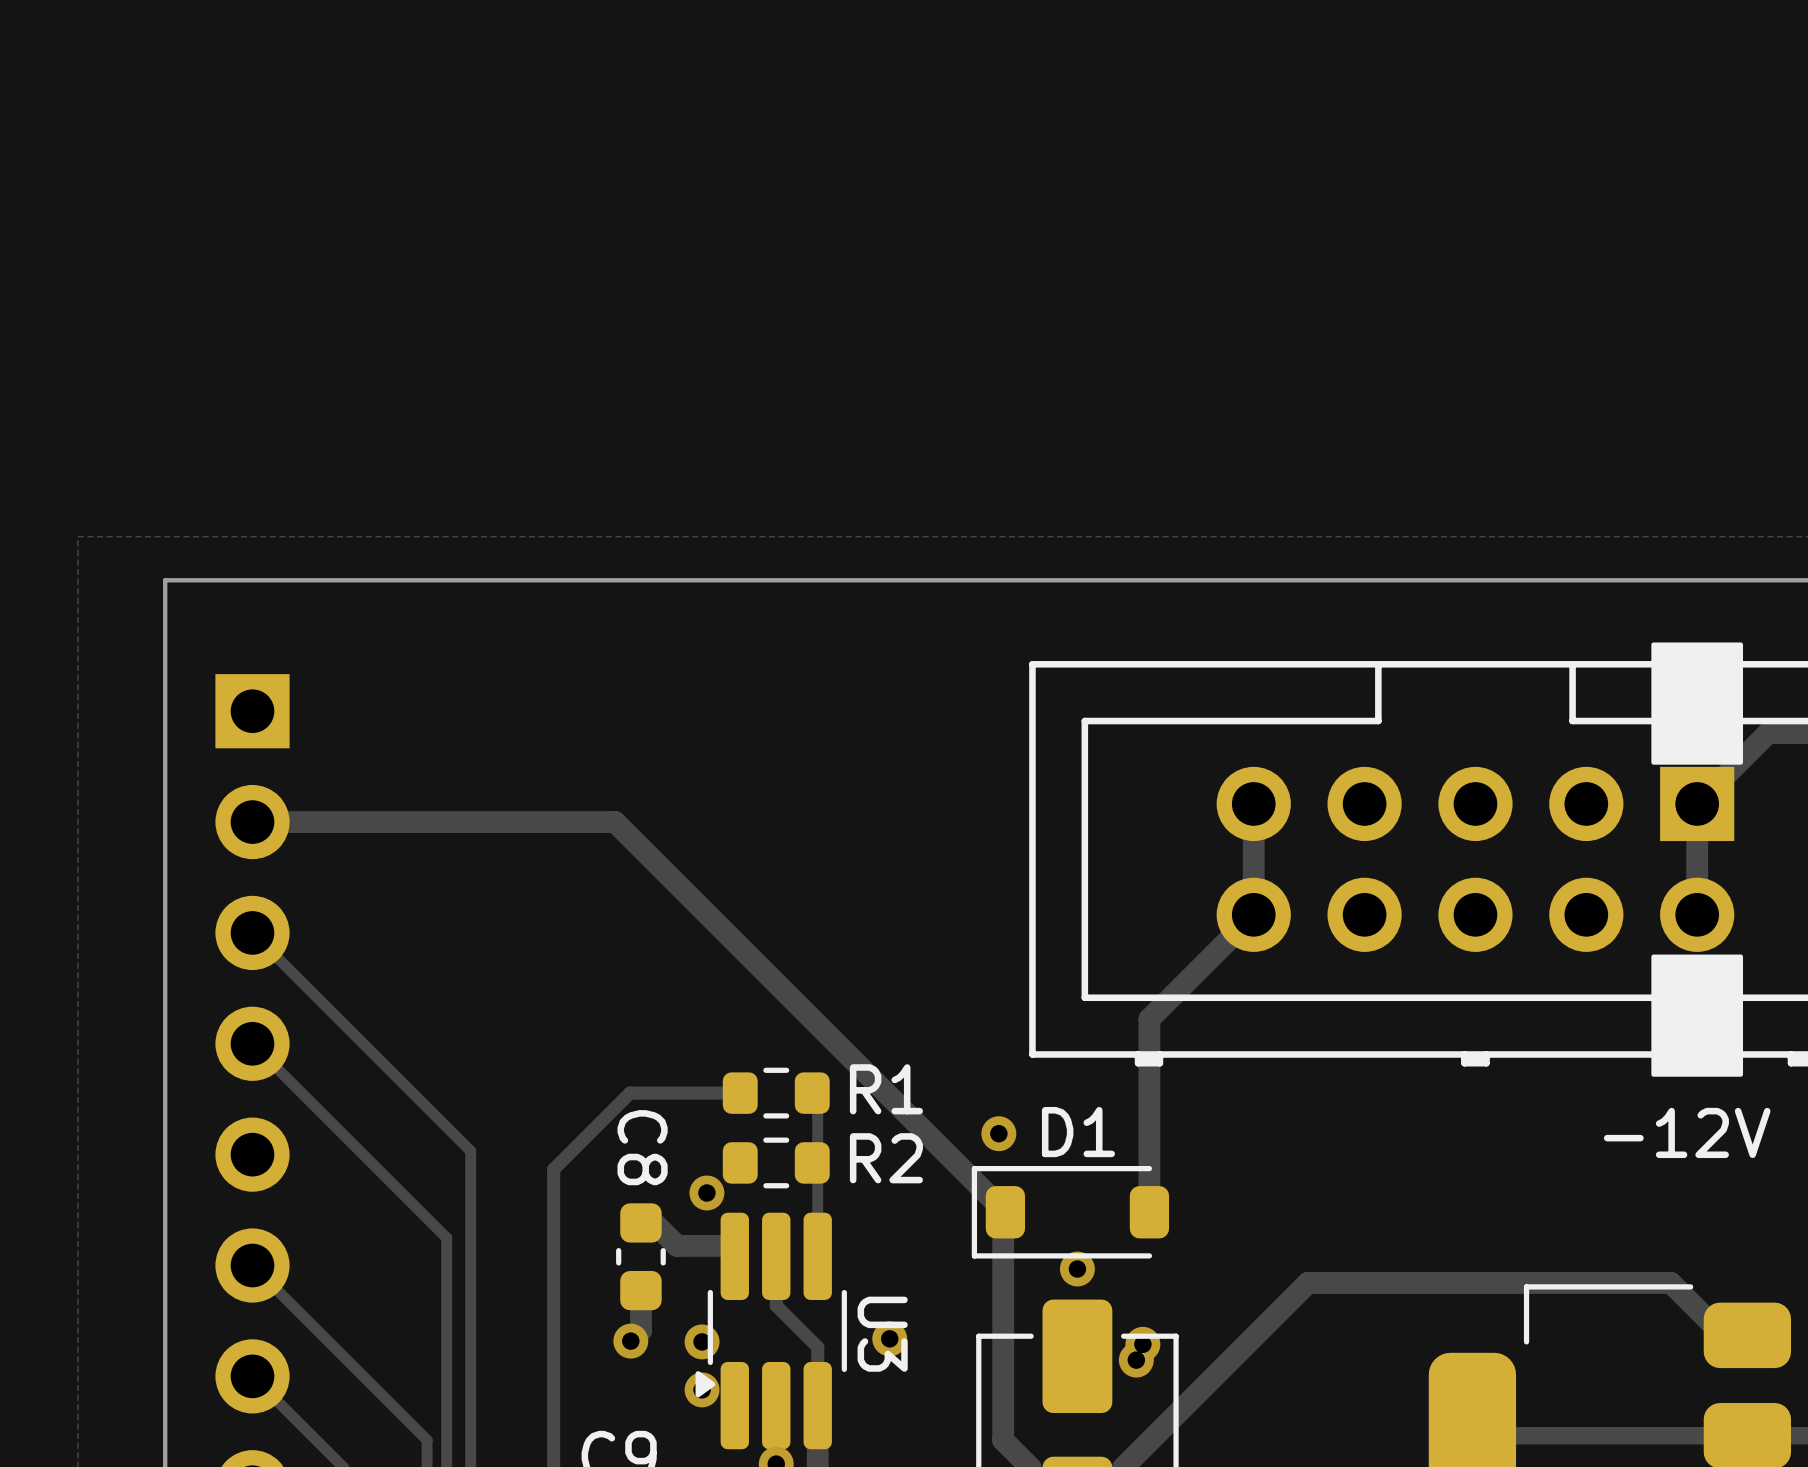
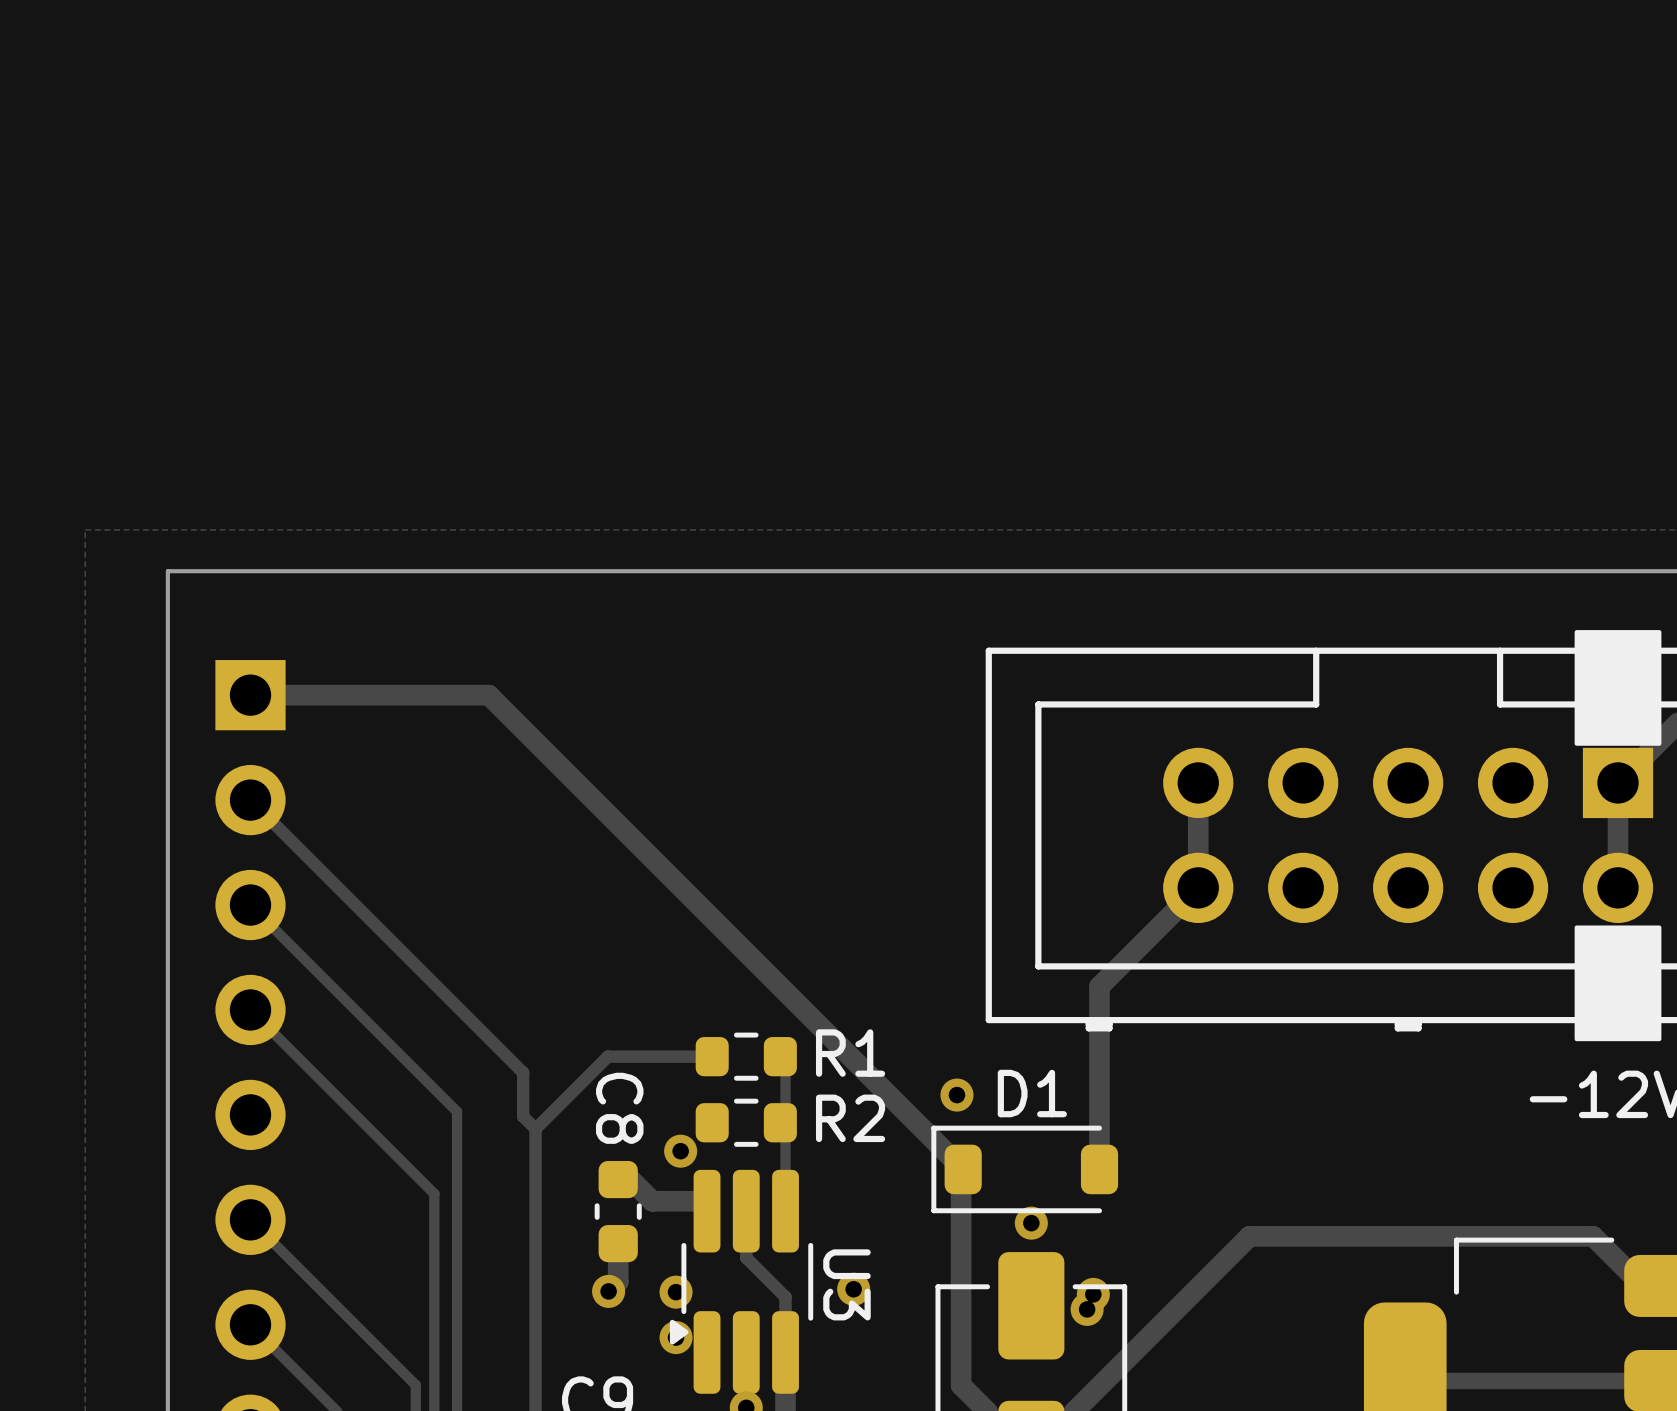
track: none -> (250, 800) (523, 1072) (523, 1116) (535, 1128)
track: (615, 822) (252, 822) -> (593, 800) (488, 695) (250, 695)

